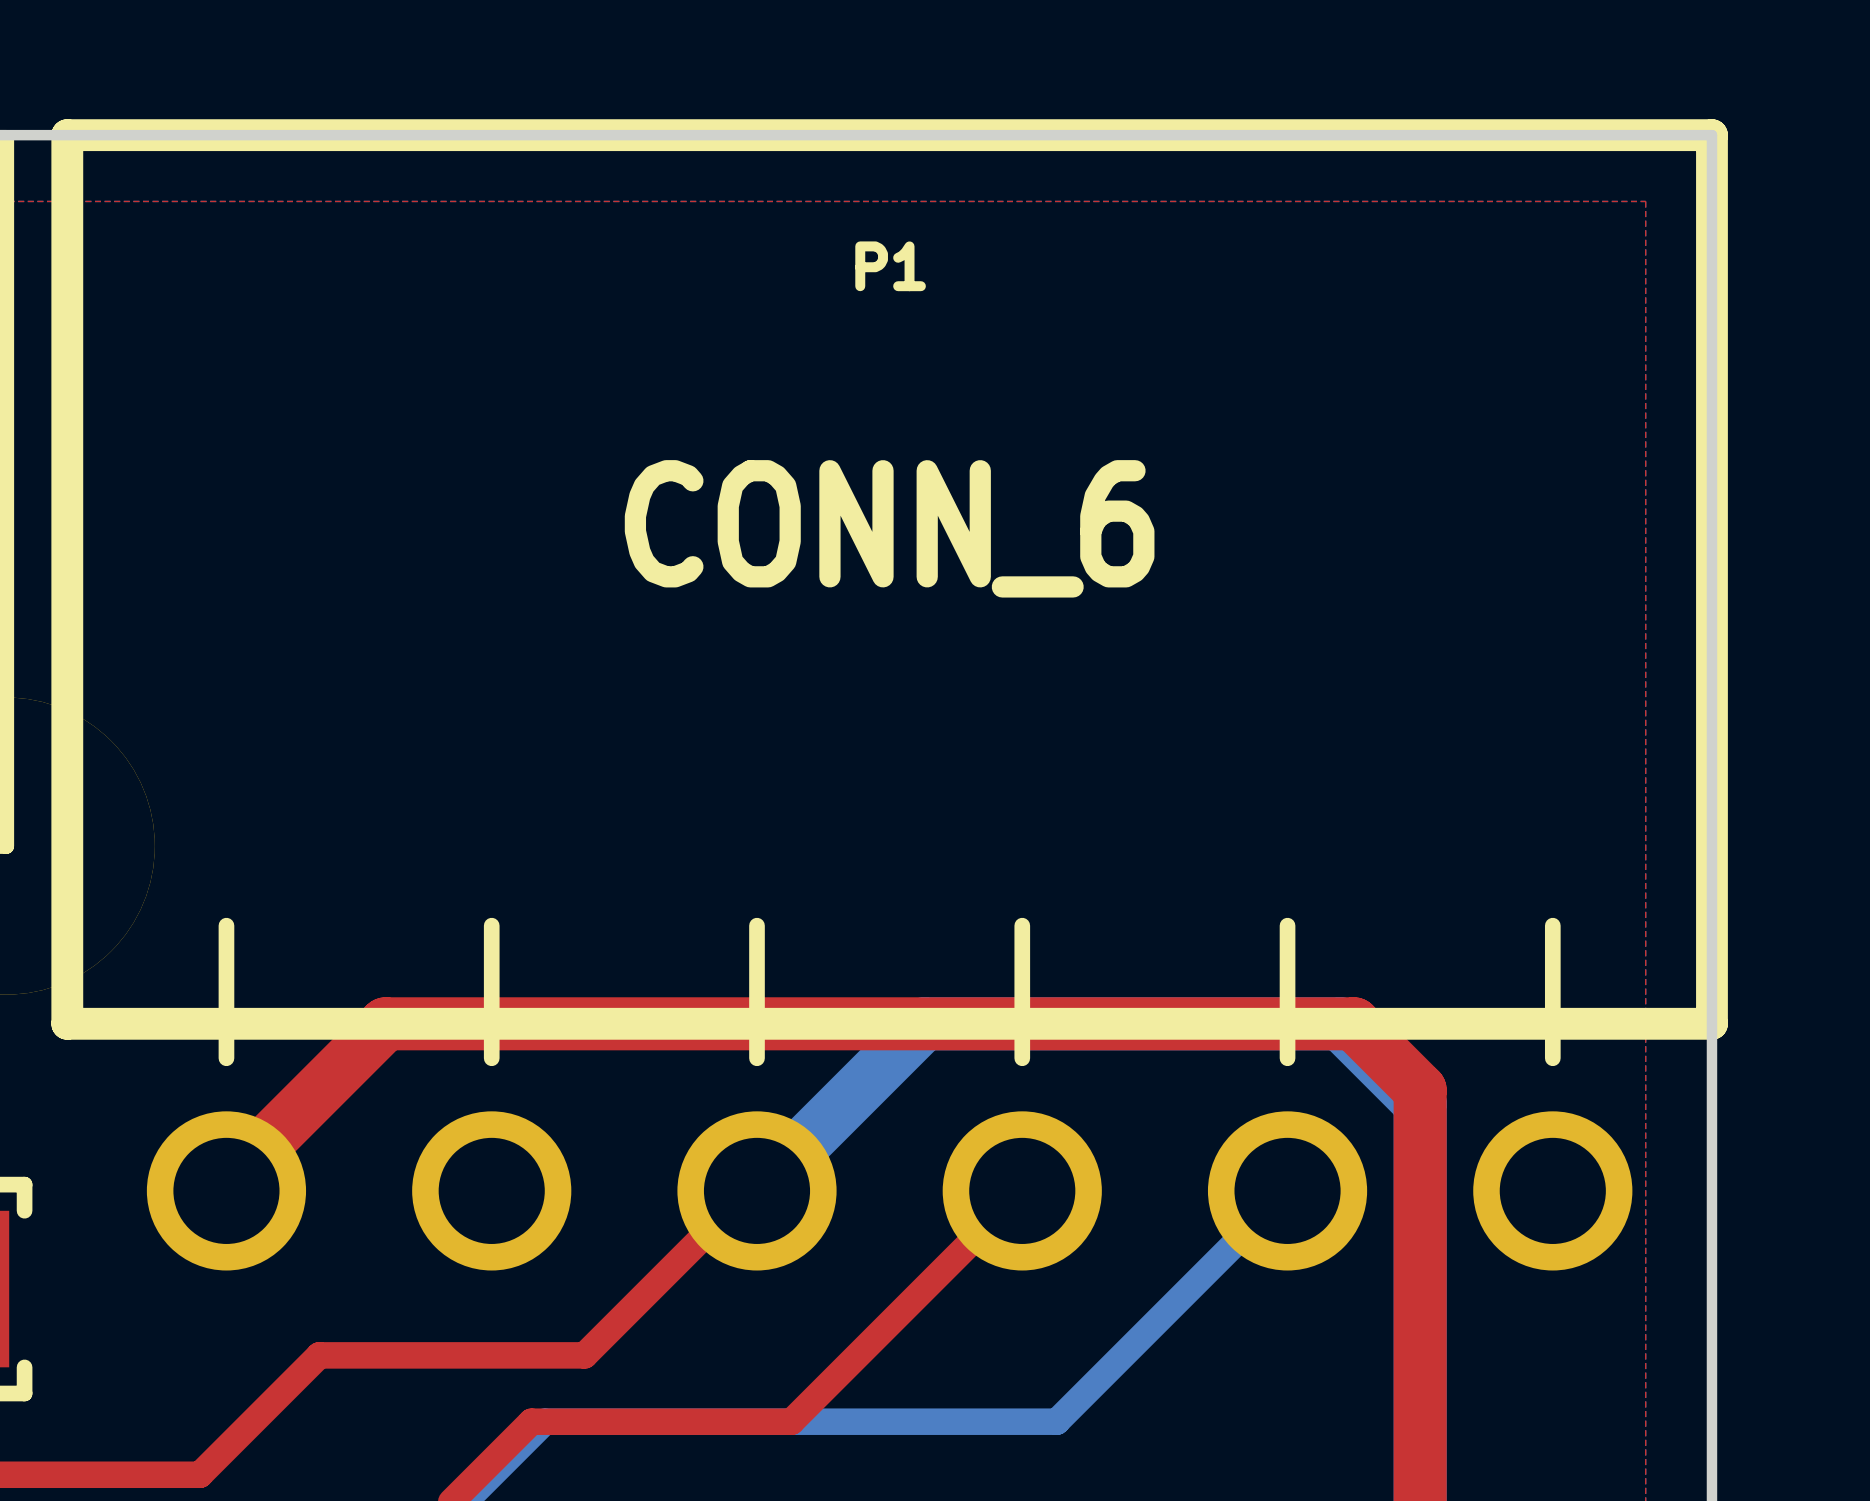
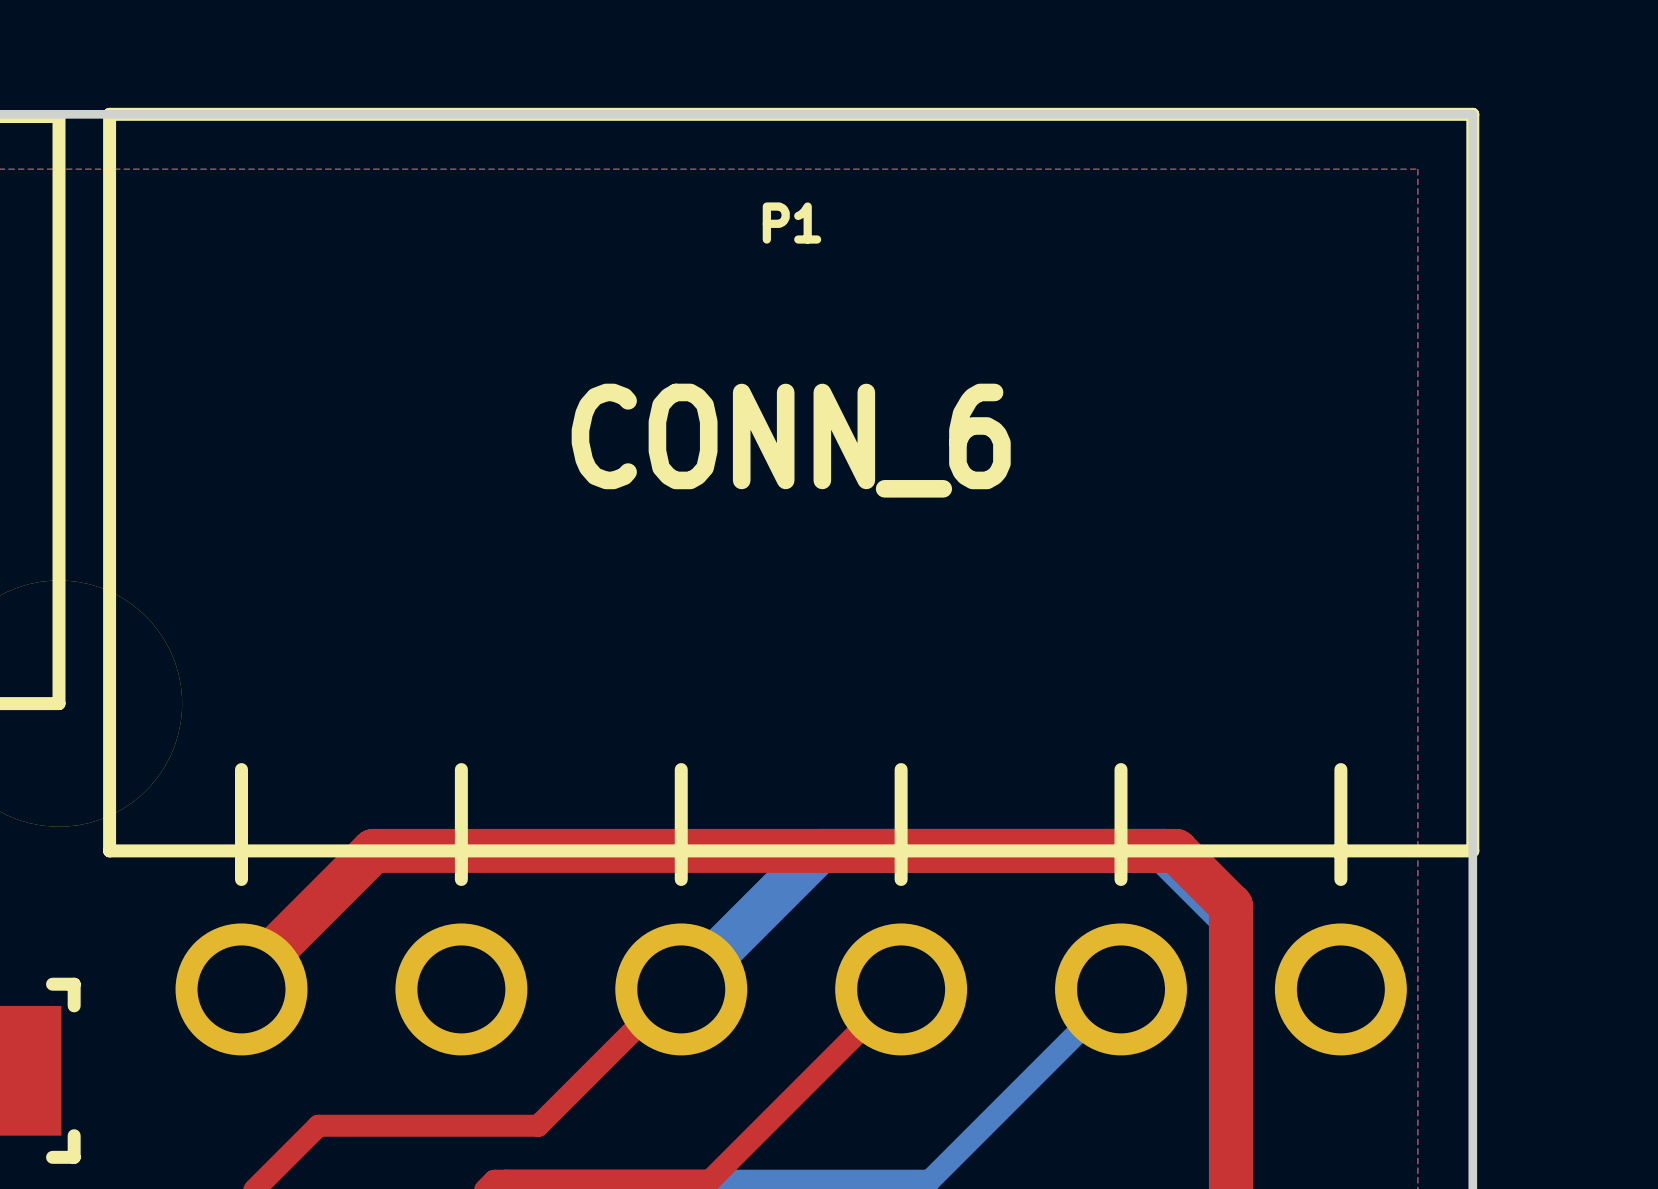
P1 footprint: [51, 119, 1728, 1271] -> [103, 107, 1480, 1056]

